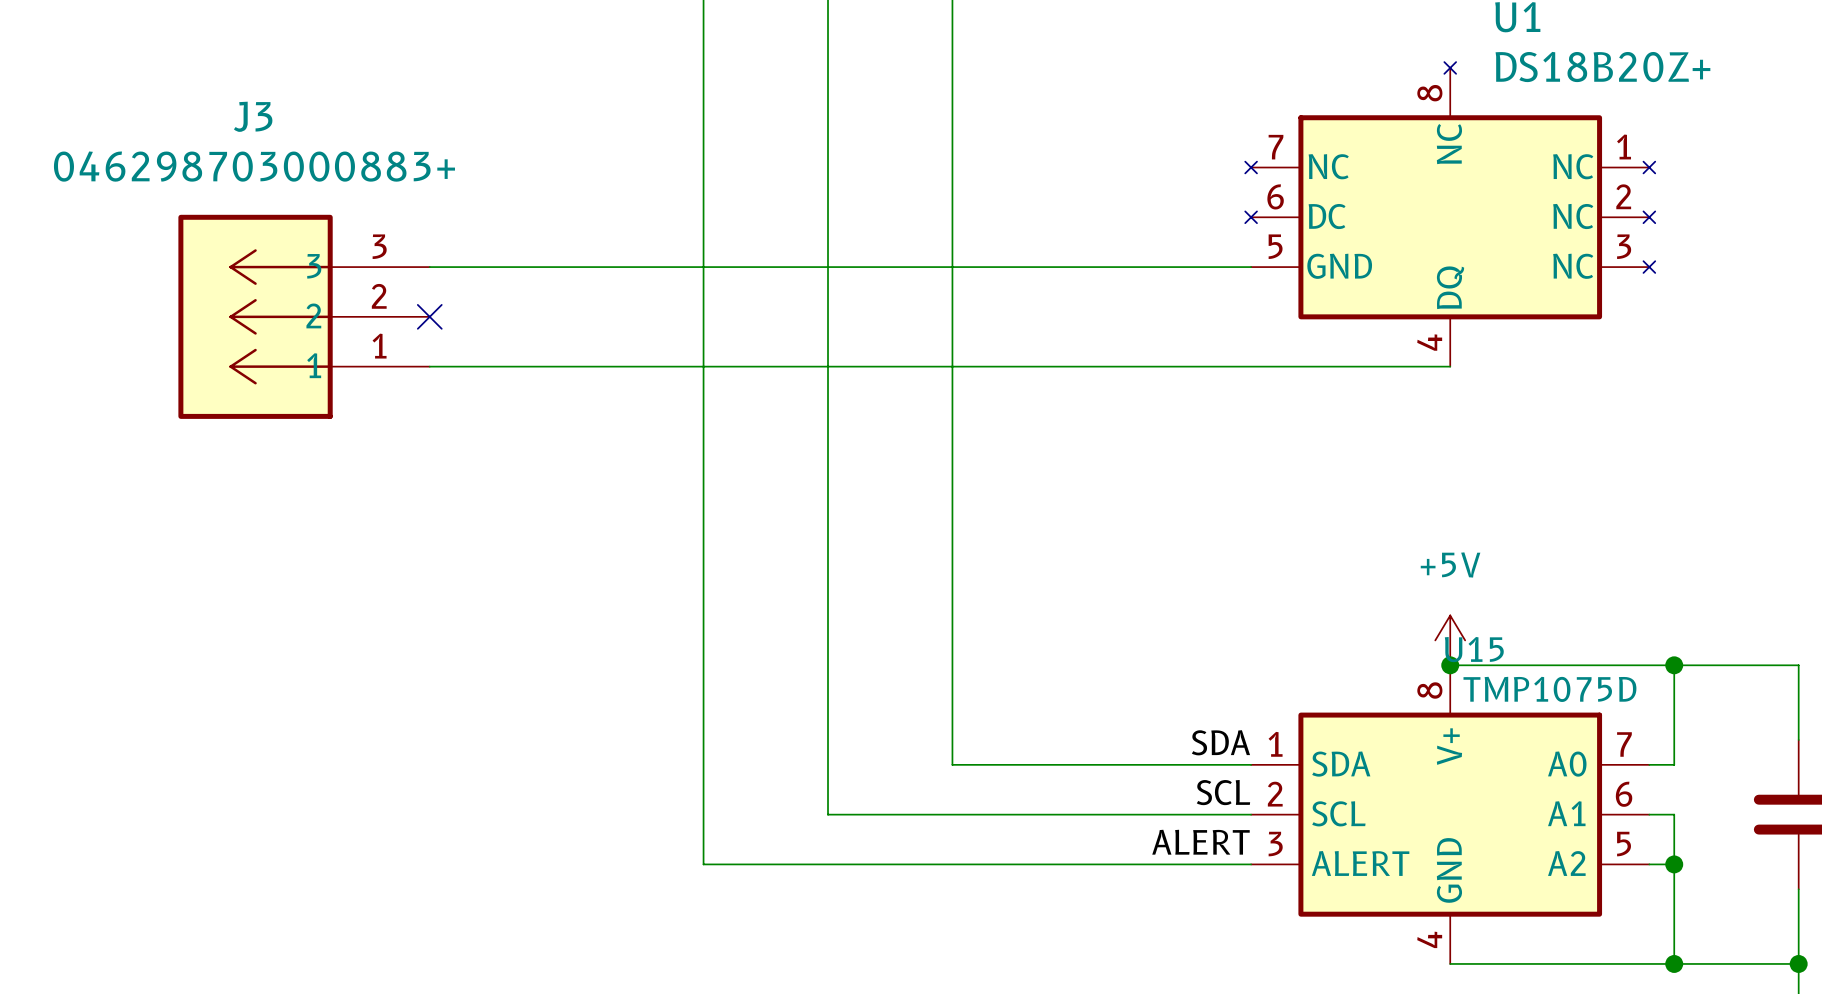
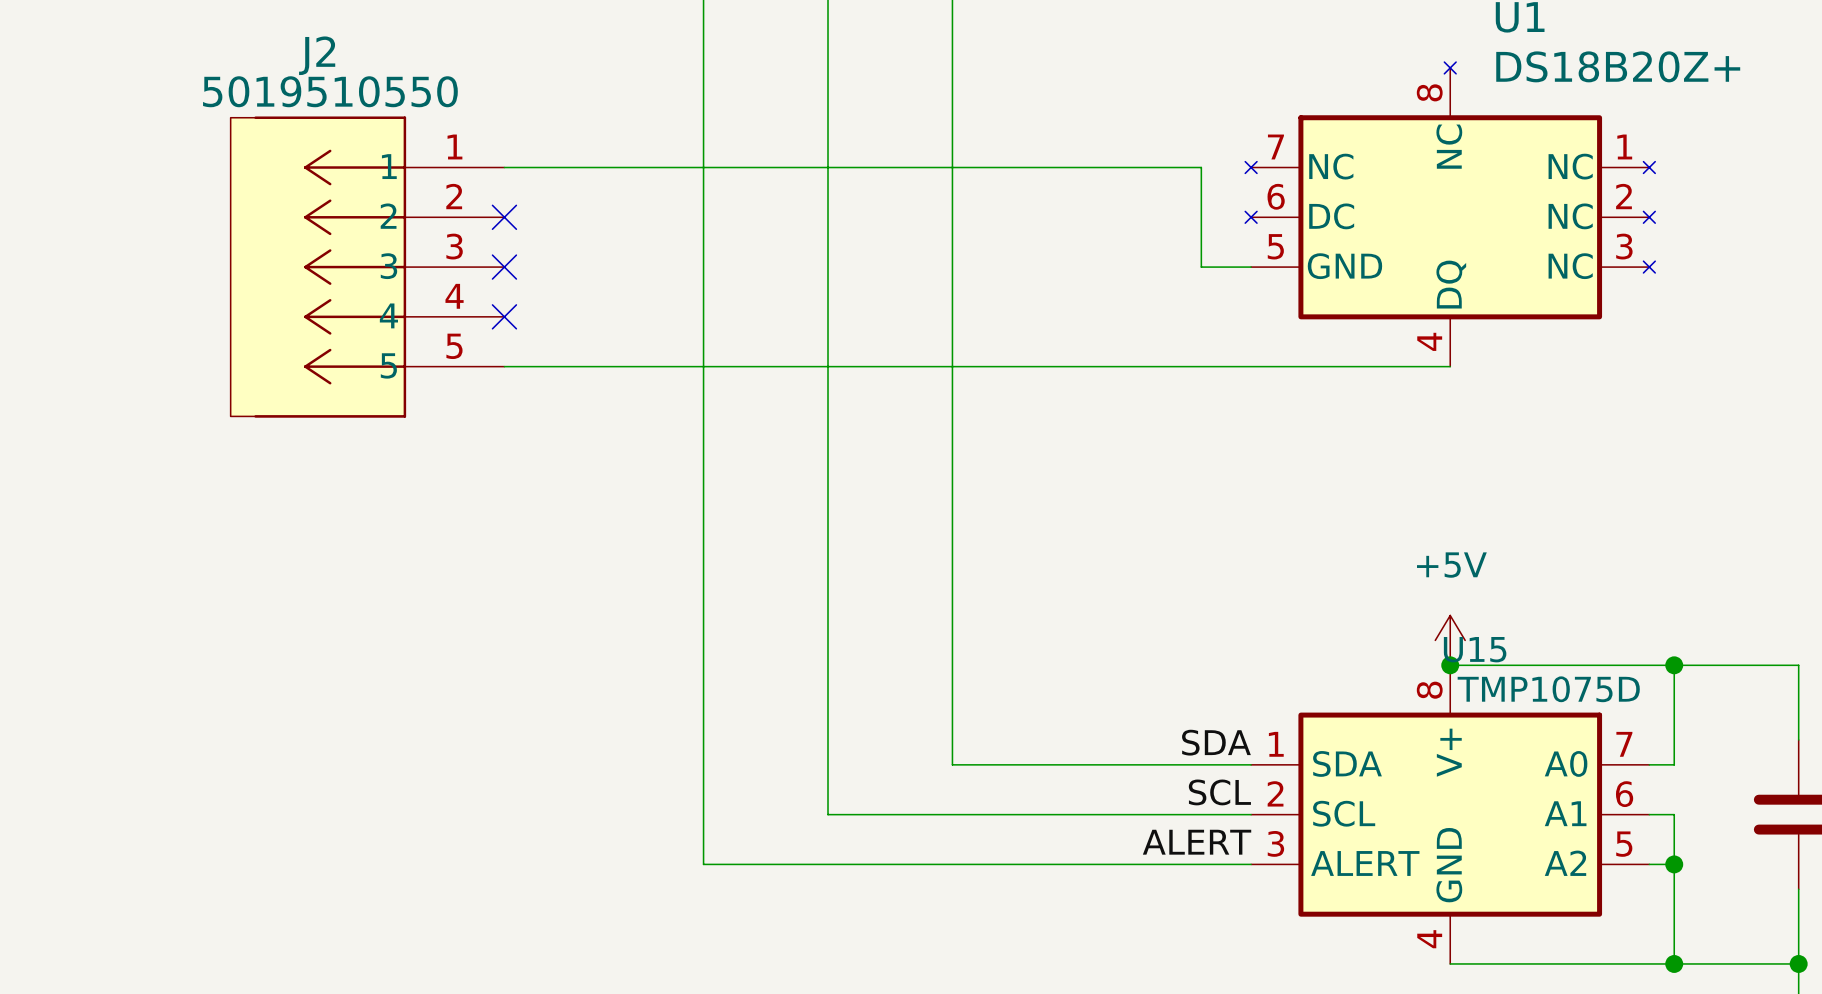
no-connect mark: none -> (504, 217)
J2: none -> 5019510550 (367, 267)
wire: (429, 267) (1201, 267) -> (504, 167) (1201, 167) (1201, 267)
no-connect mark: none -> (504, 267)
J3: 046298703000883+ (304, 316) -> none
no-connect mark: (429, 316) -> none
no-connect mark: none -> (504, 316)

